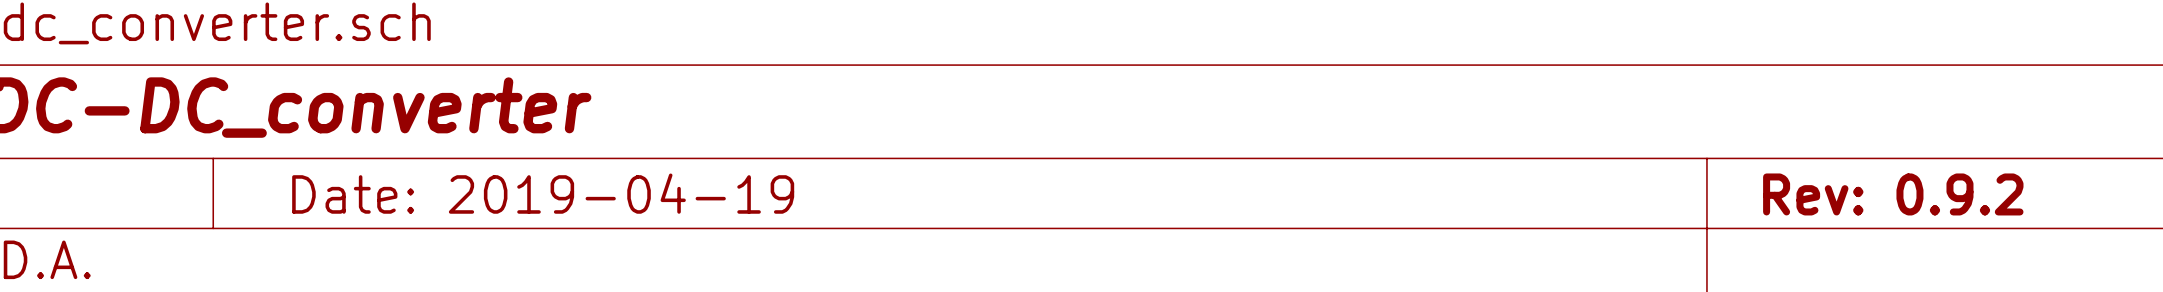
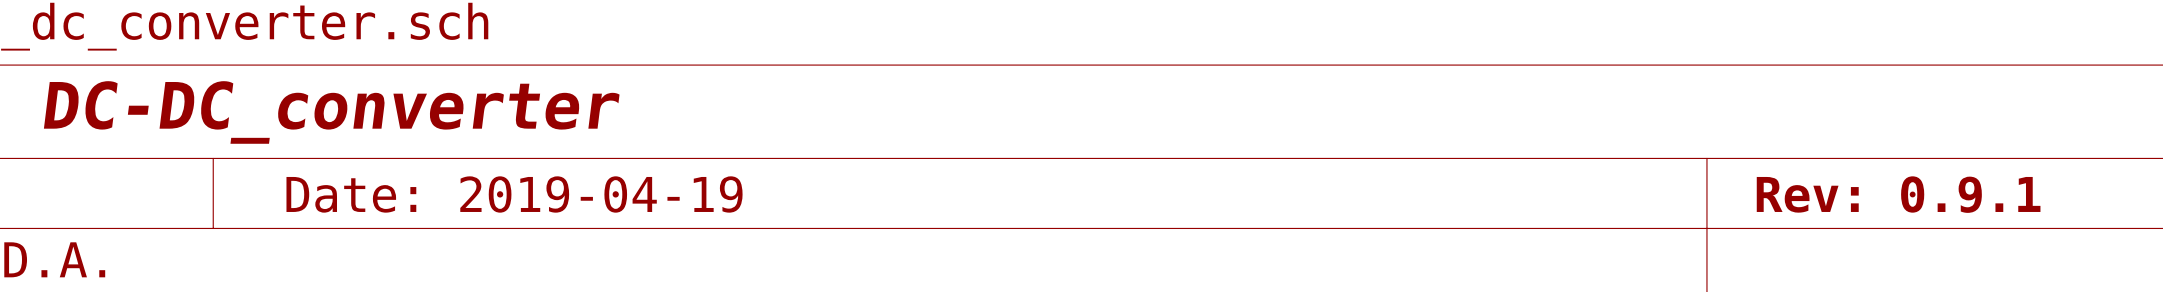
title block: Rev: 0.9.2 (1893, 194) -> Rev: 0.9.1 (1898, 194)

